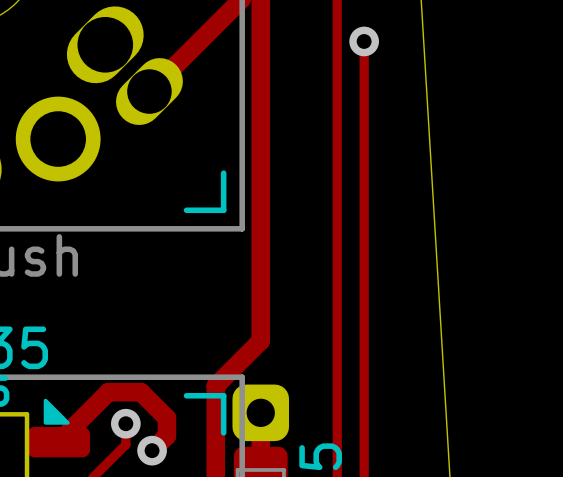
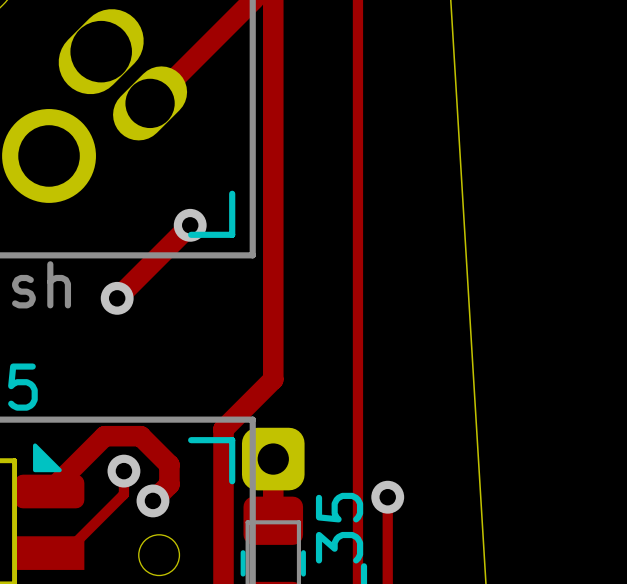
track: (364, 41) (364, 447) -> none
via: (364, 41) -> none
track: none -> (190, 225) (117, 298)
via: none -> (190, 225)
via: none -> (117, 298)
via: none -> (387, 497)

